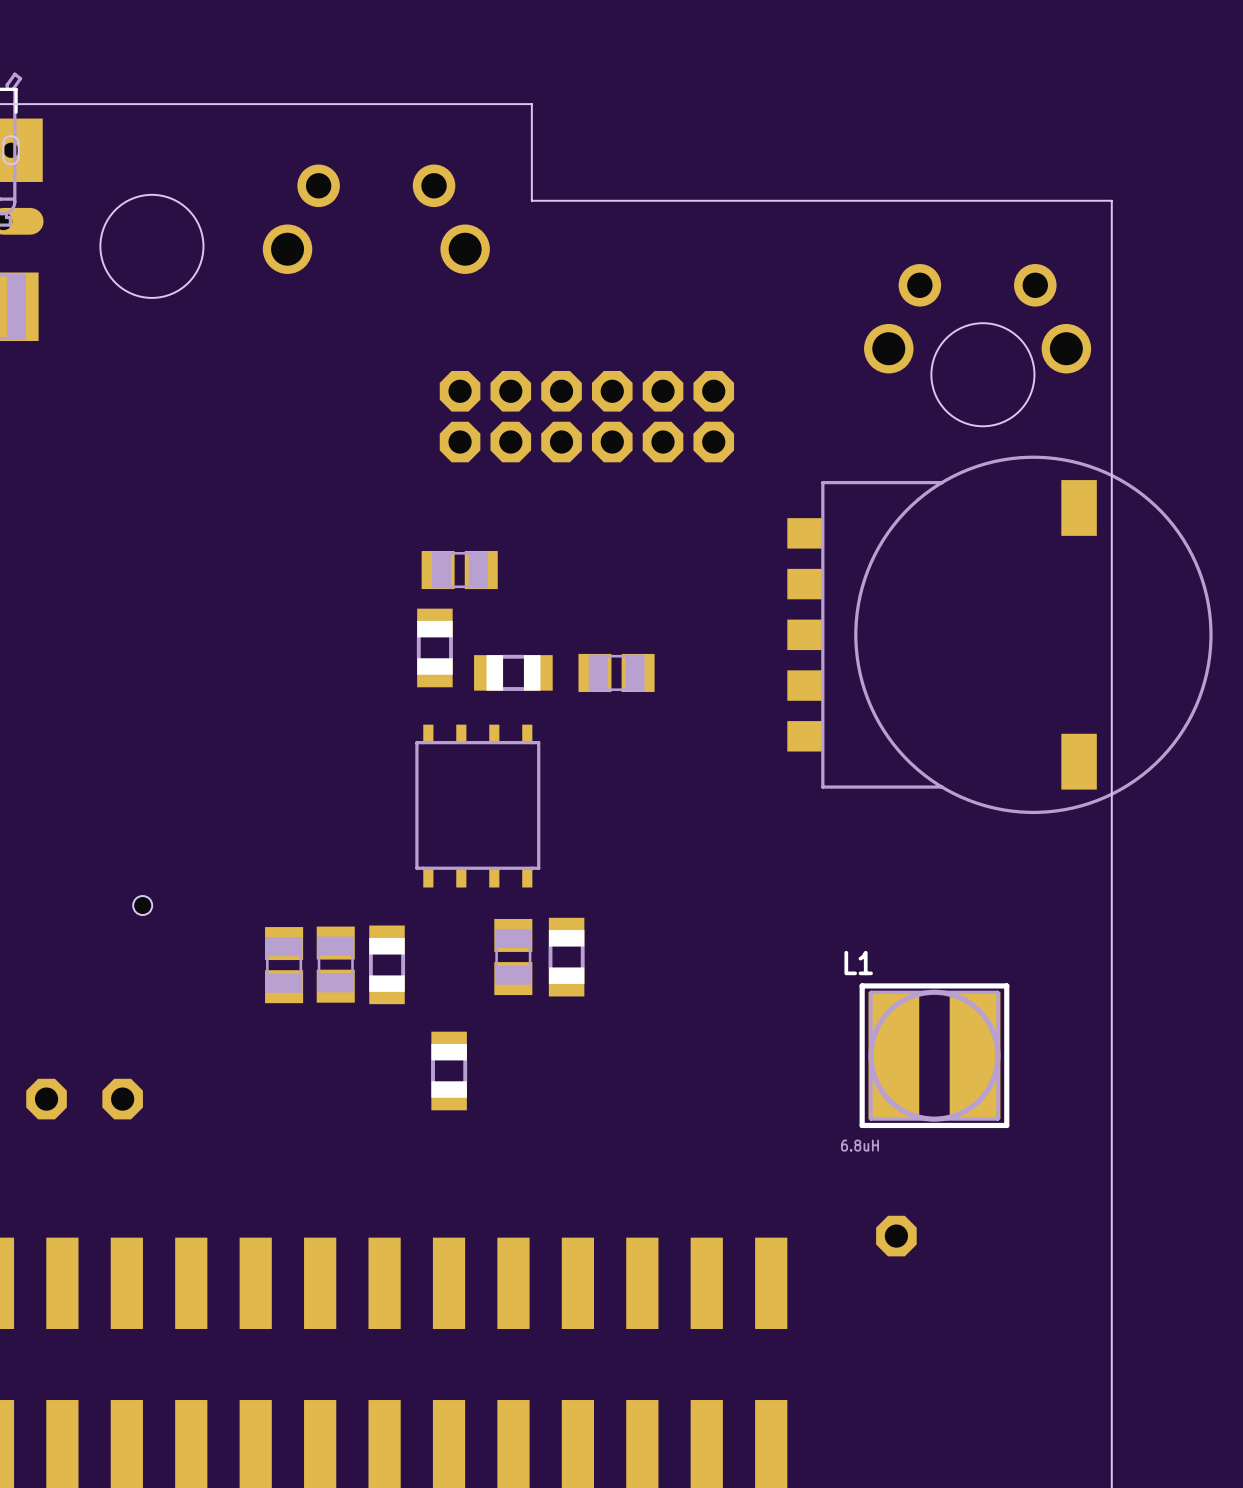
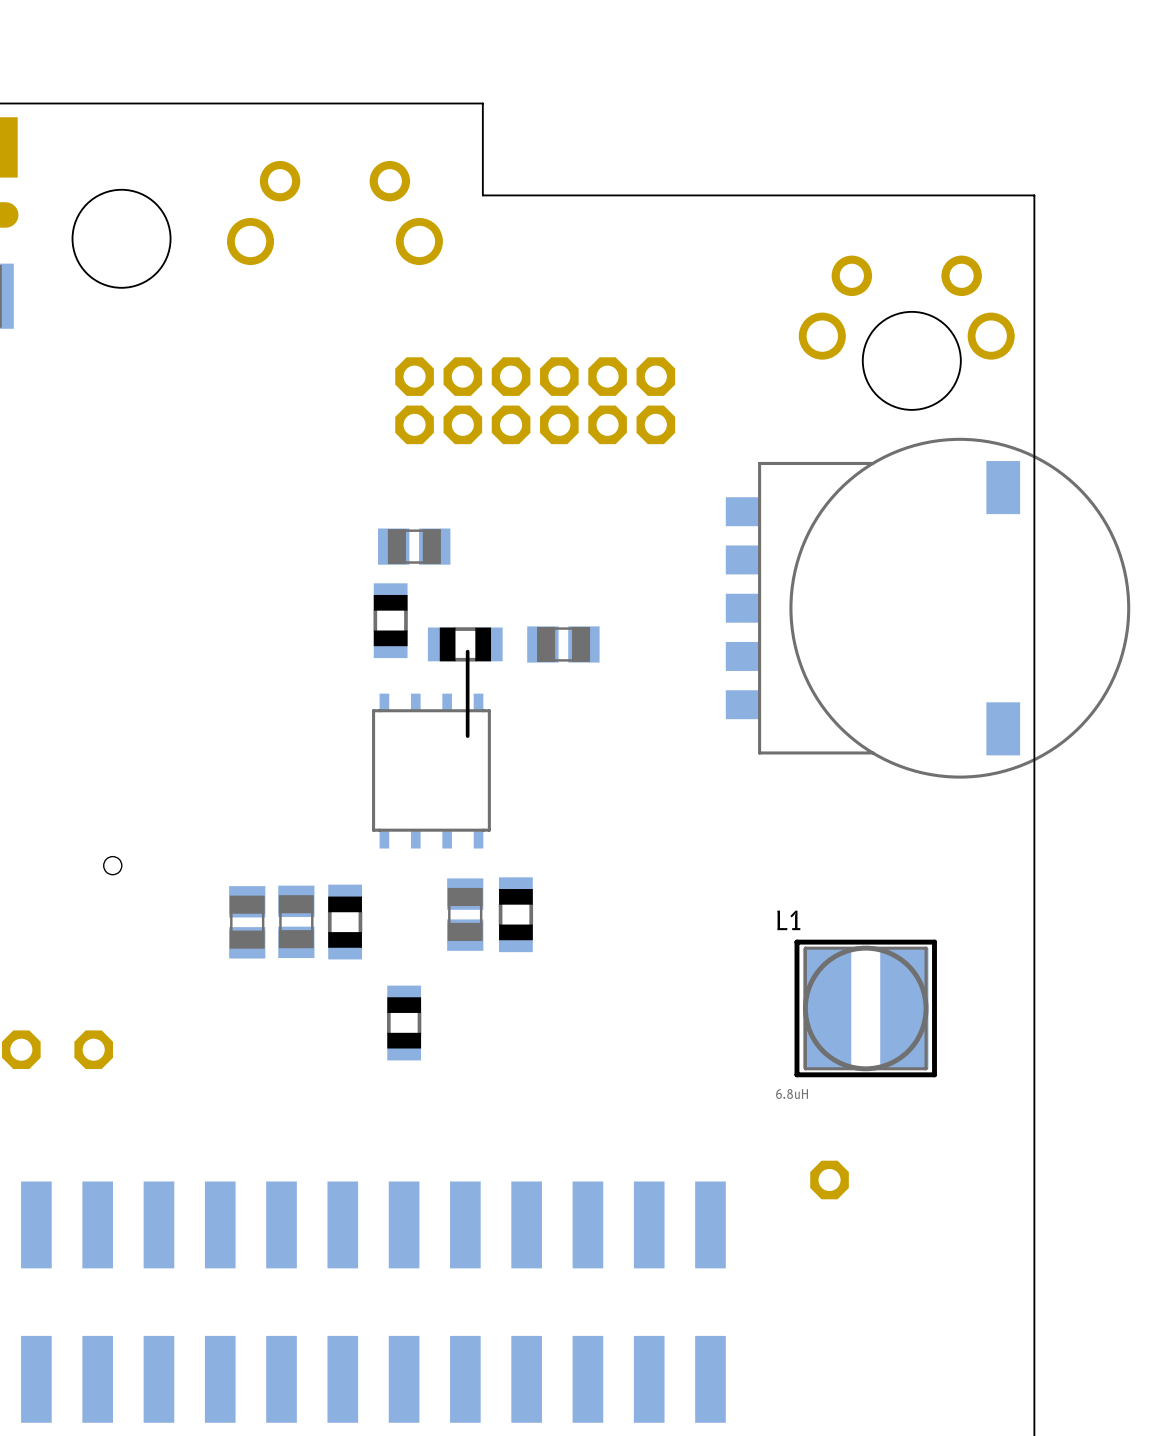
line: none -> (467, 651) (467, 736)

